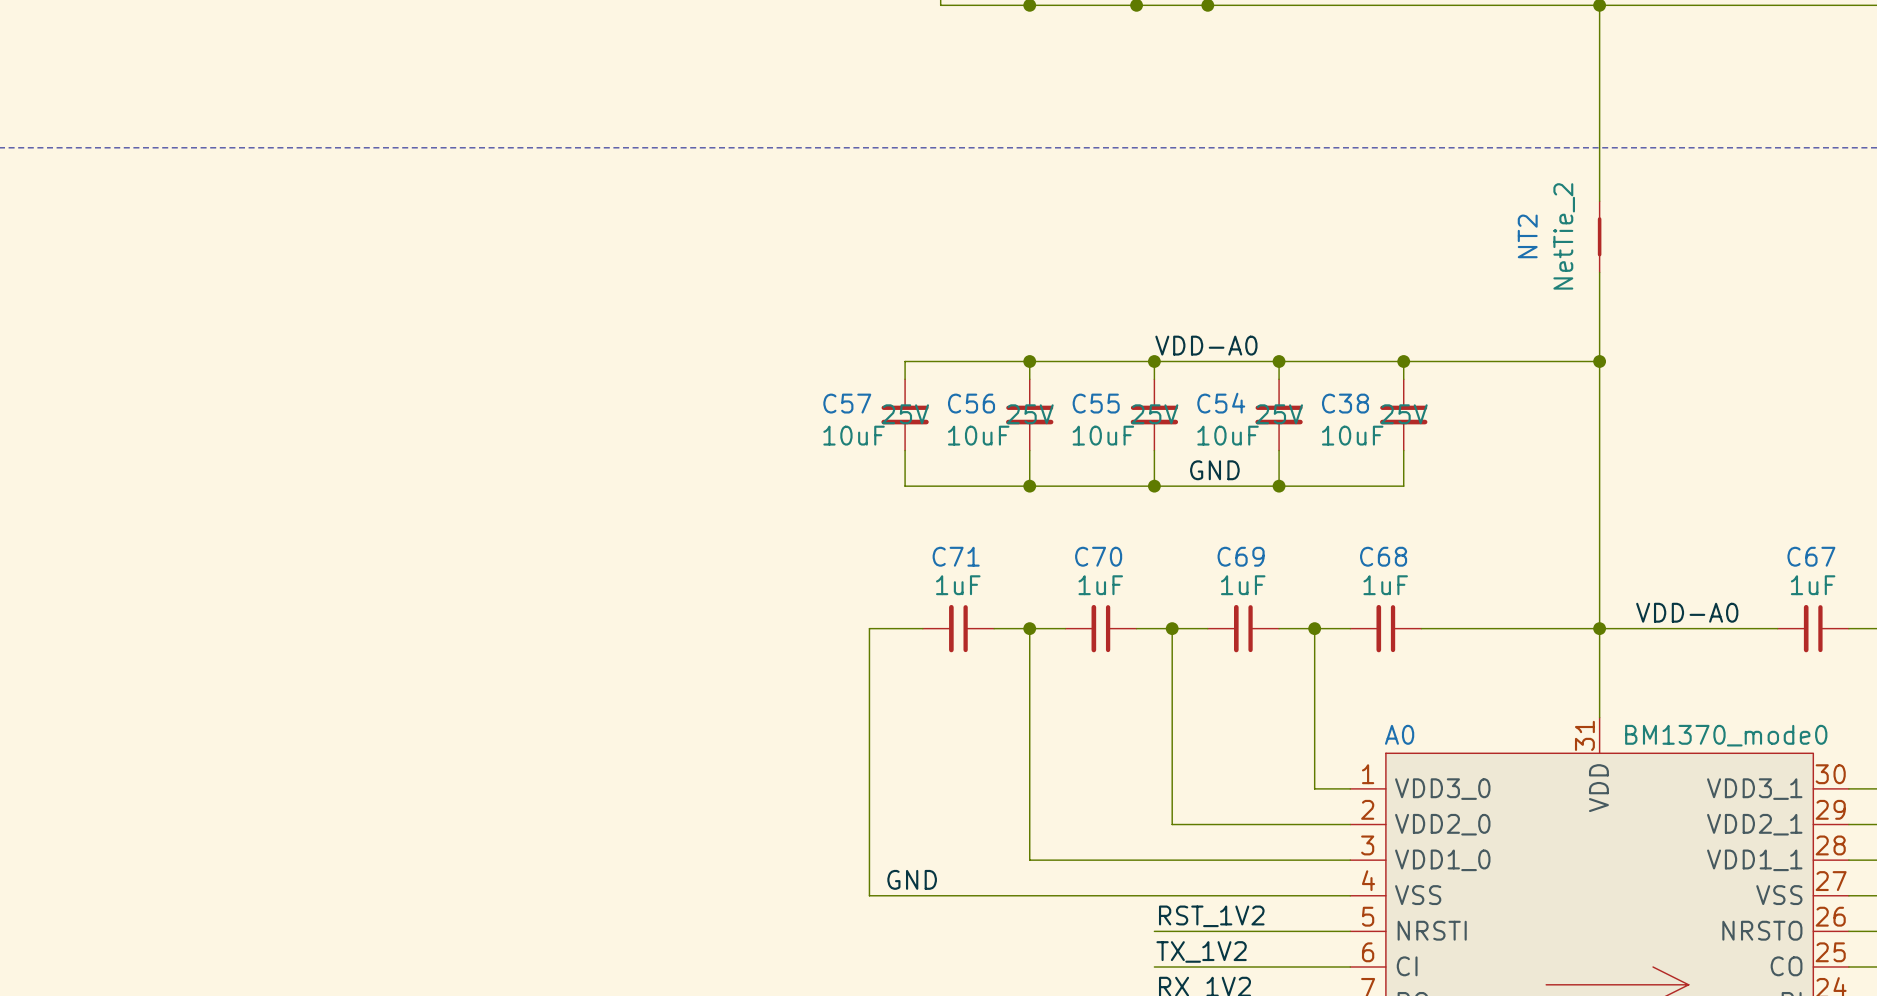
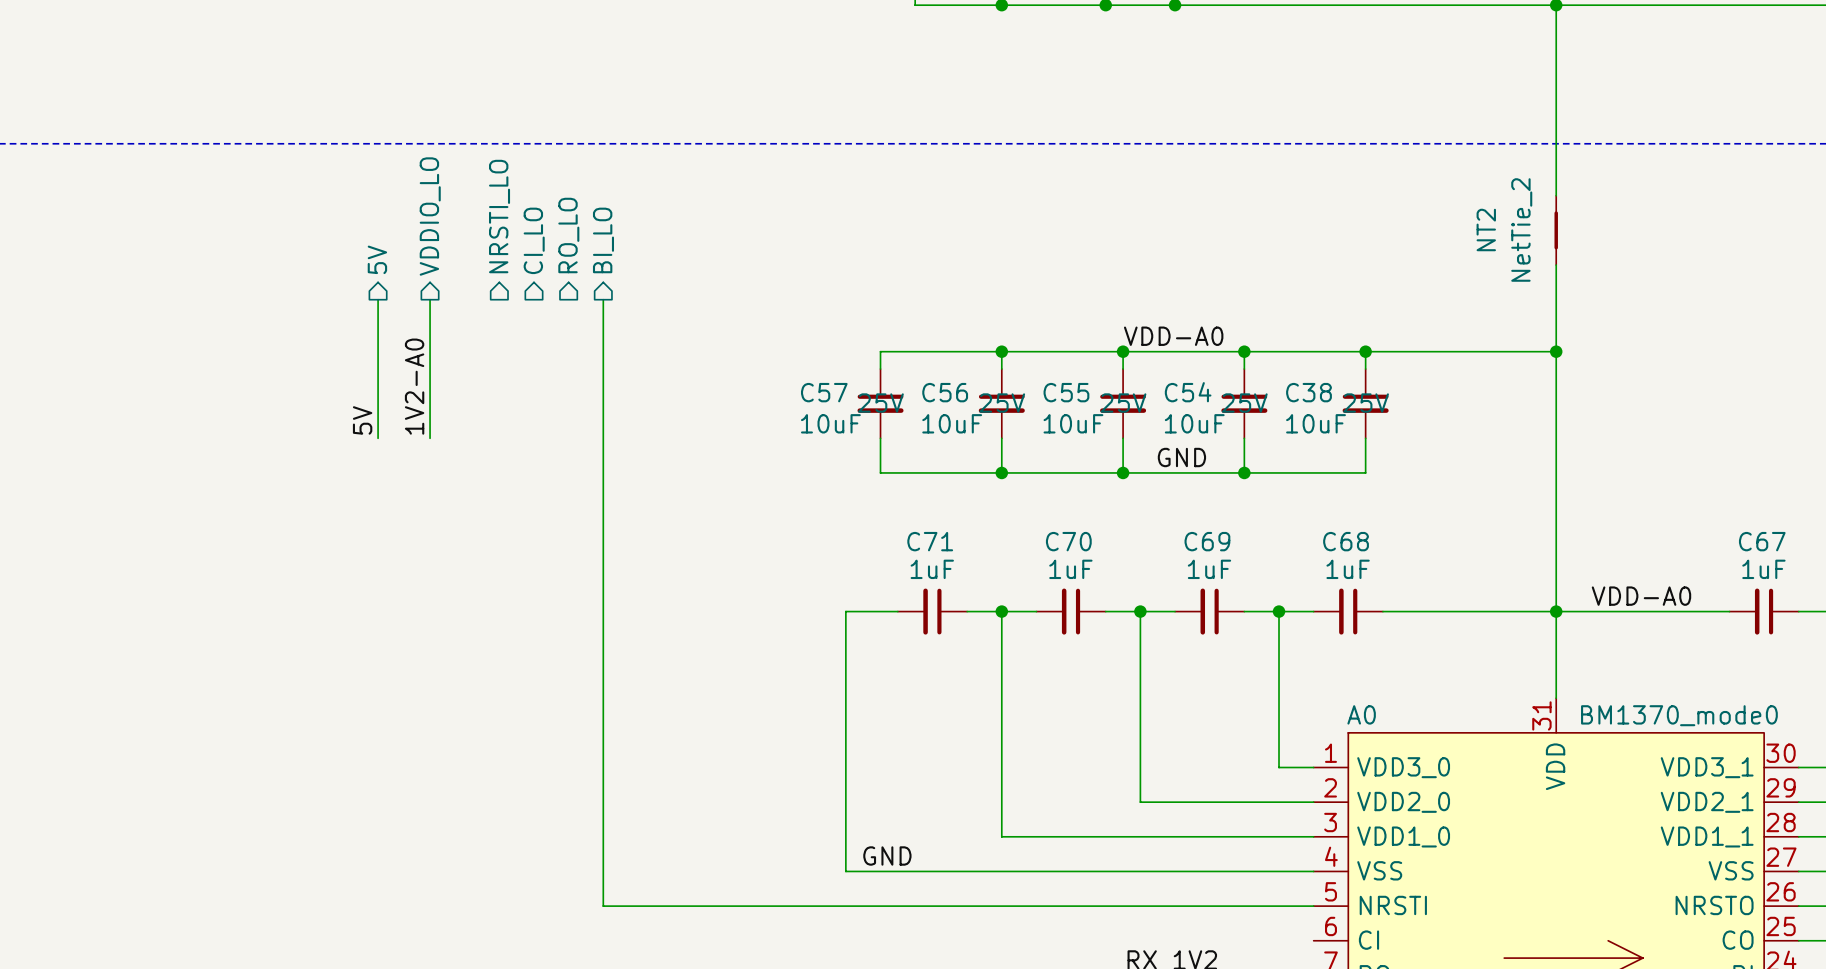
sheet pin: none -> VDDIO_LO (430, 216)
sheet pin: none -> NRSTI_LO (499, 216)
sheet pin: none -> RO_LO (568, 235)
sheet pin: none -> CI_LO (534, 240)
sheet pin: none -> BI_LO (603, 240)
sheet pin: none -> 5V (377, 259)
wire: none -> (378, 299) (378, 438)
wire: none -> (430, 299) (430, 438)
wire: none -> (603, 299) (603, 906) (1123, 906)
label: none -> 1V2-A0 (414, 386)
label: none -> 5V (362, 420)
label: RST_1V2 (1211, 916) -> none
label: TX_1V2 (1201, 951) -> none
wire: (1154, 966) (1350, 966) -> none

